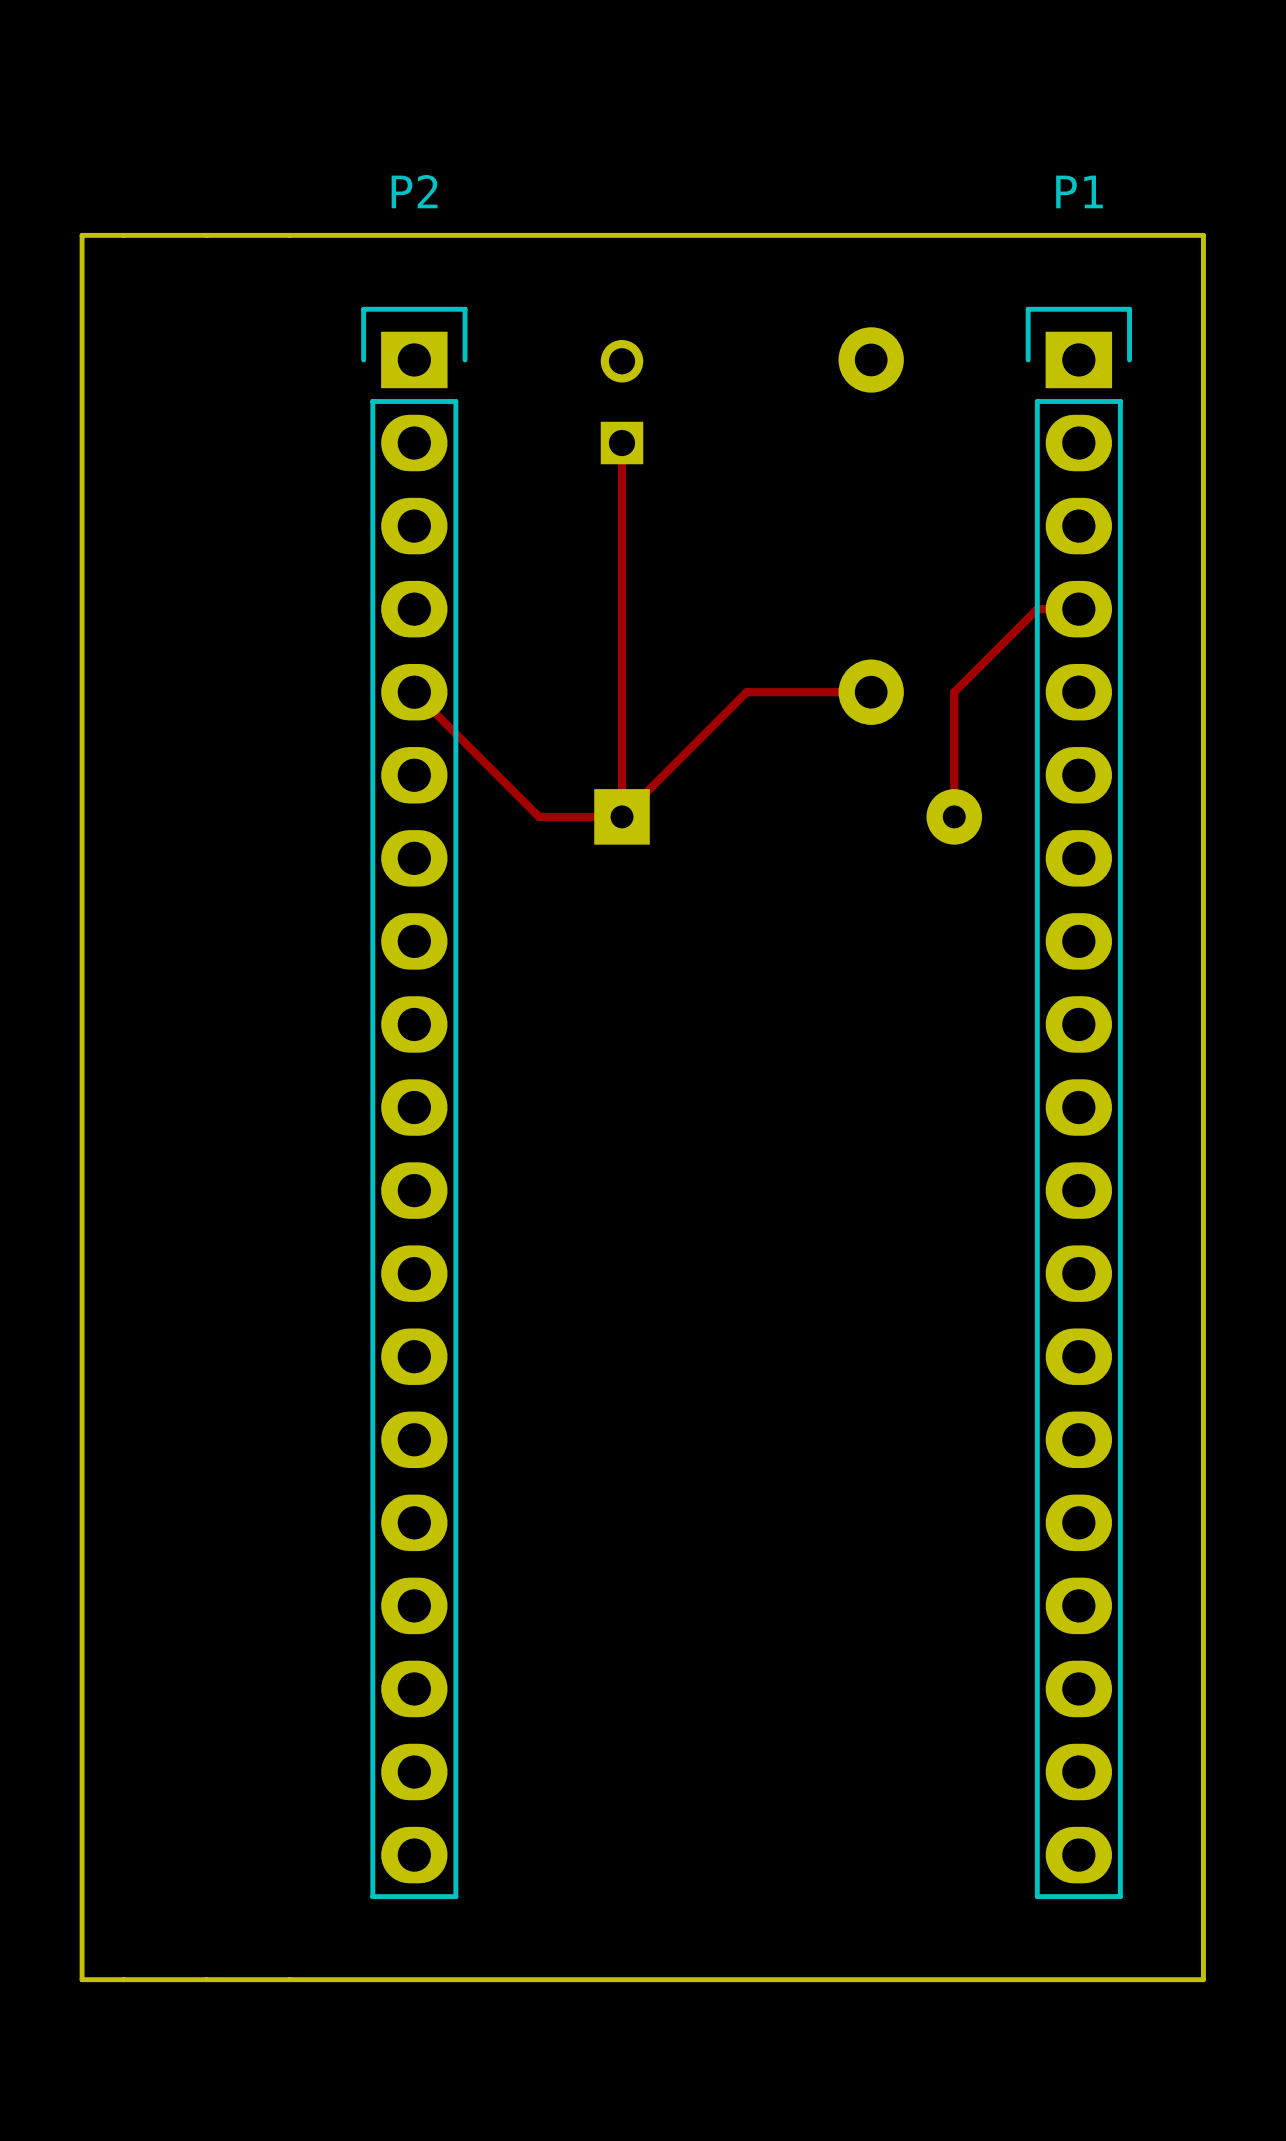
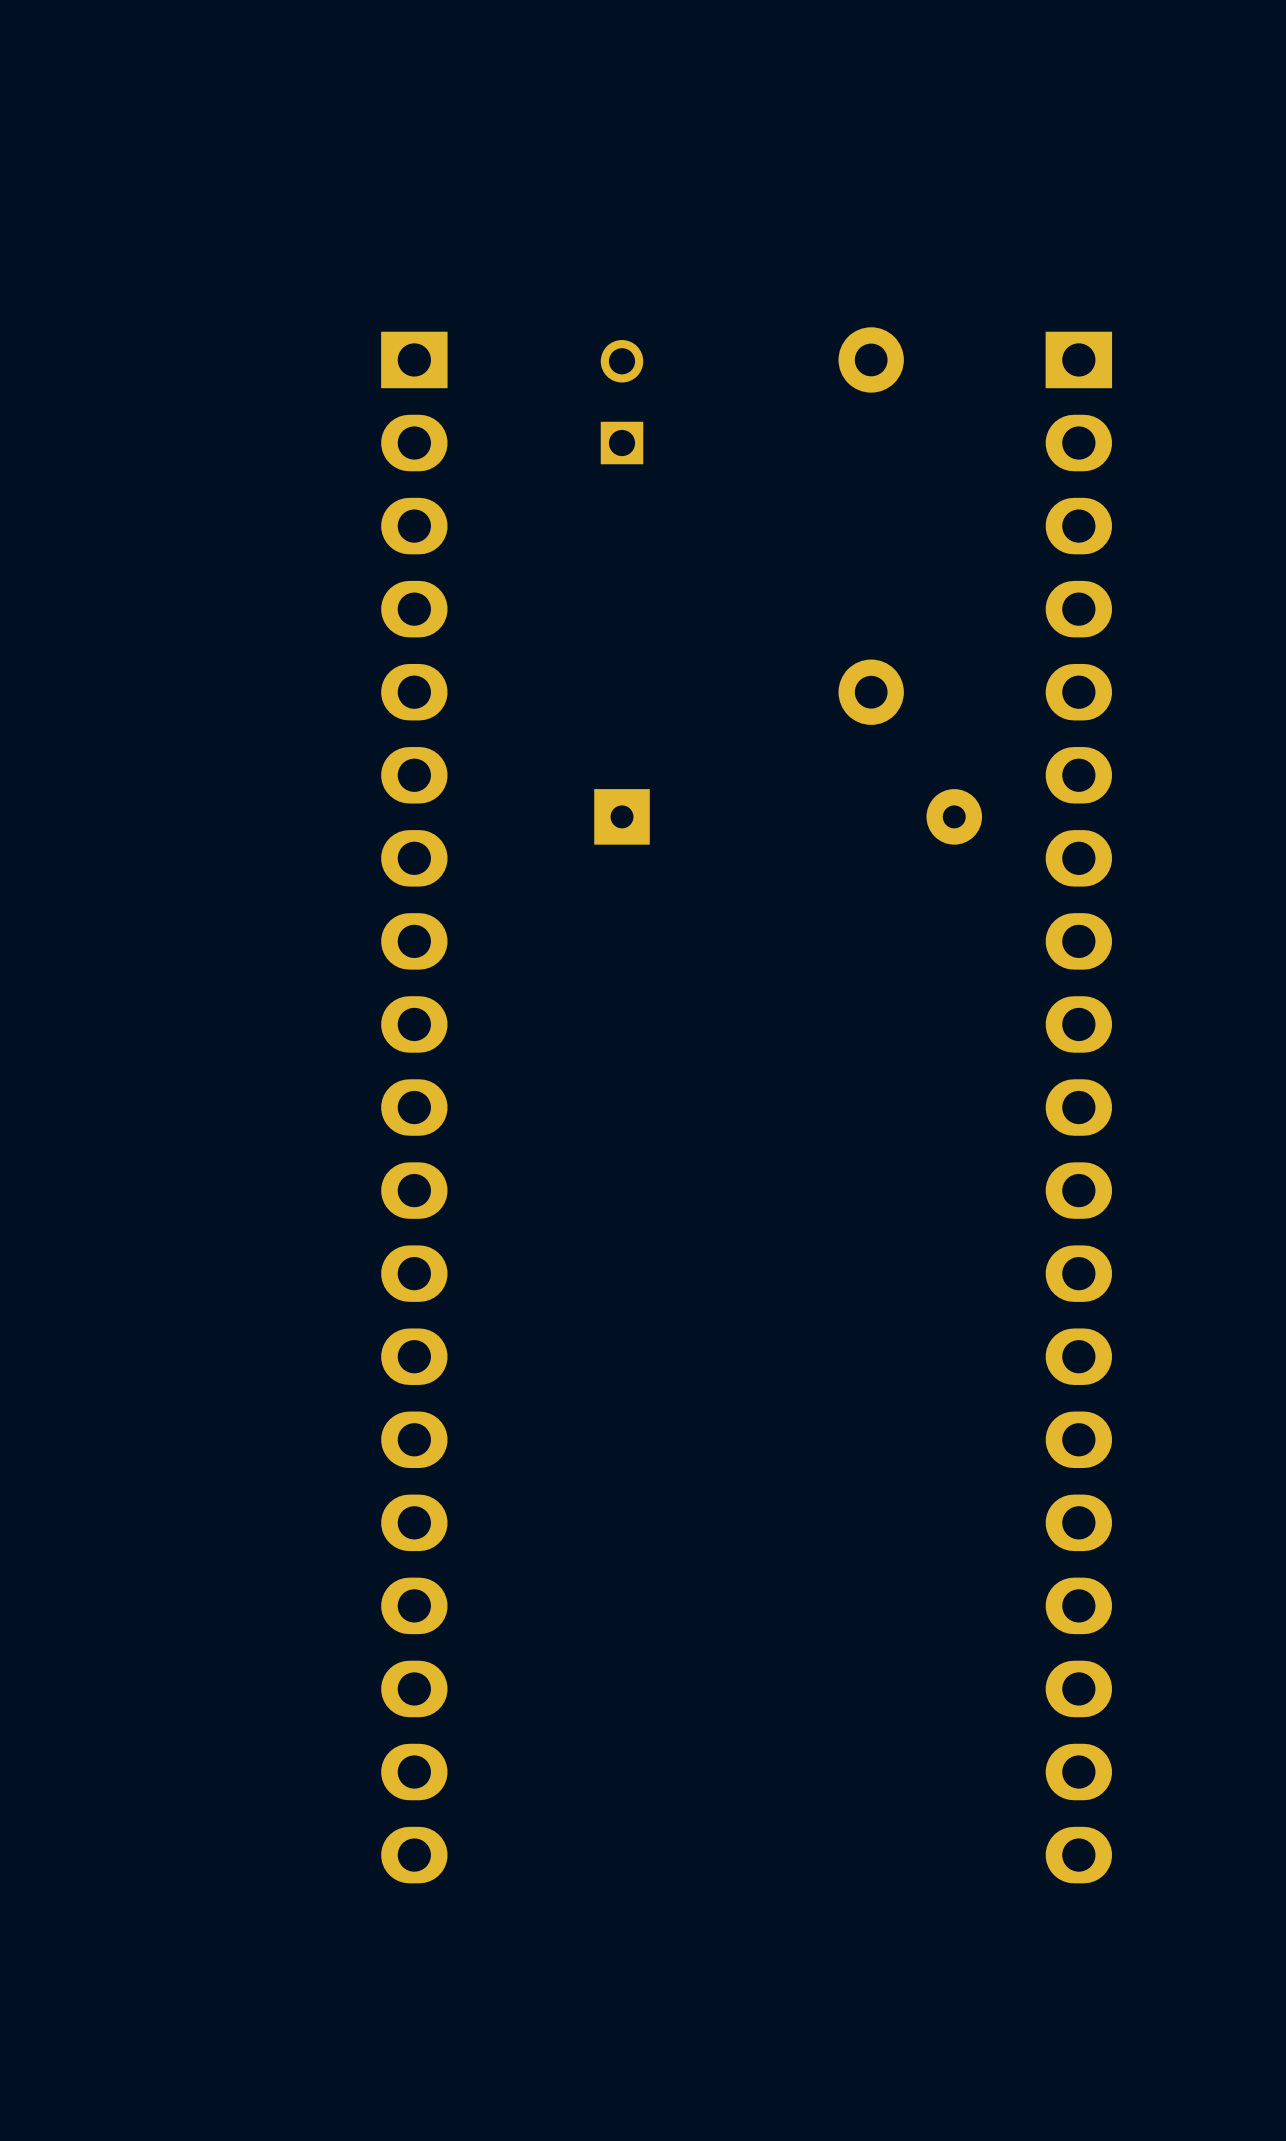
board edge: (1203, 235) (82, 235) (82, 1979) (1203, 1979) (1203, 235) -> none
top track: (622, 443) (622, 816) -> none
top track: (1078, 609) (1037, 609) (954, 692) (954, 816) -> none
top track: (414, 692) (539, 816) (622, 816) -> none
top track: (871, 692) (746, 692) (622, 816) -> none
P2 side: bottom (414, 1102) -> top (414, 1107)
P1 side: bottom (1078, 1102) -> top (1078, 1107)

